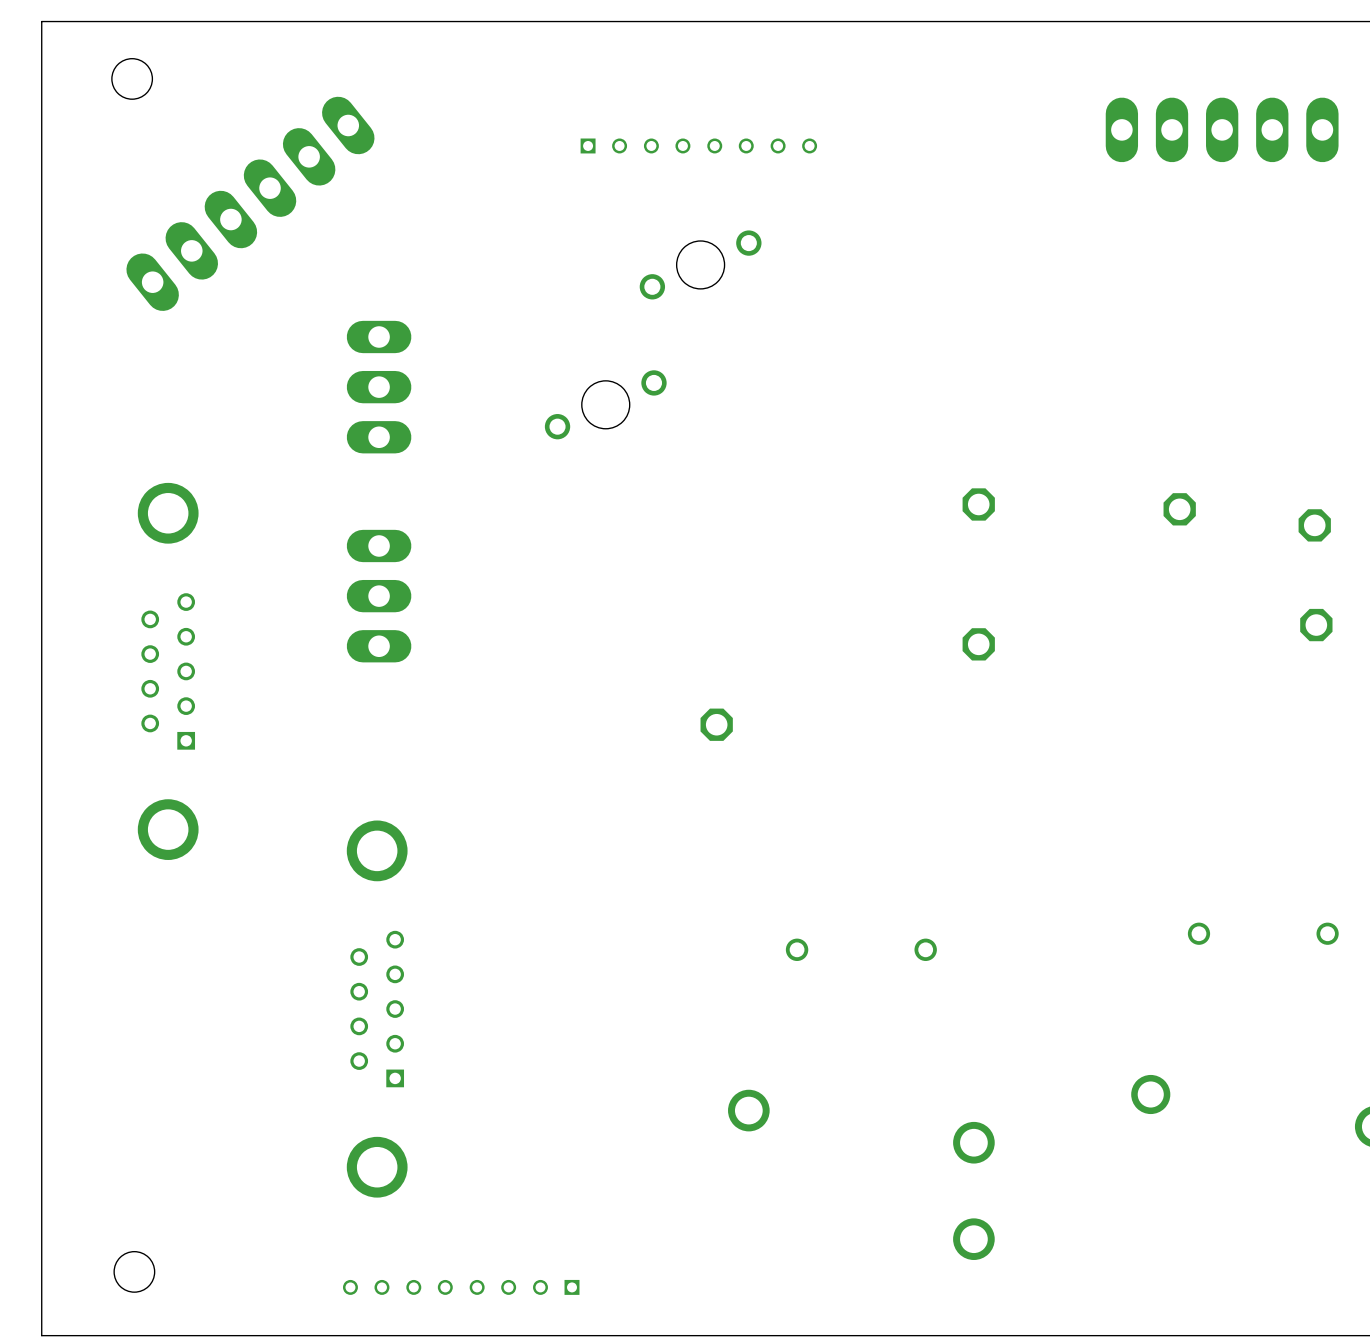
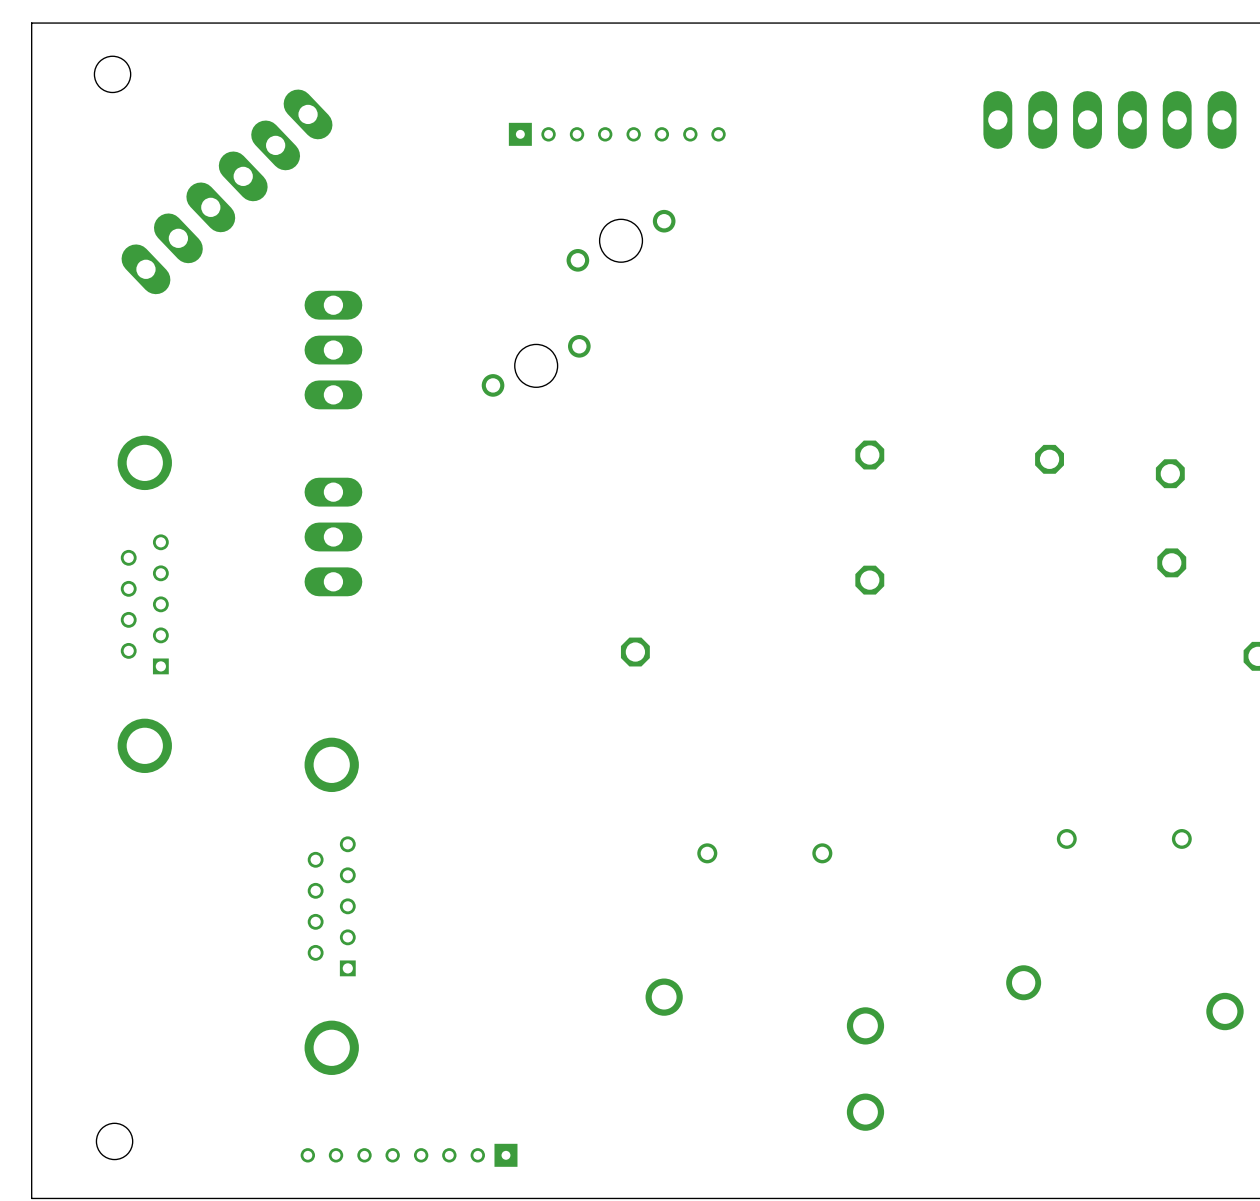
part footprint: [580, 138, 818, 154] -> [508, 122, 726, 146]
part rotation: 0° (250, 203) -> 5° counterclockwise (227, 191)
part footprint: [342, 1279, 580, 1295] -> [300, 1143, 518, 1167]

